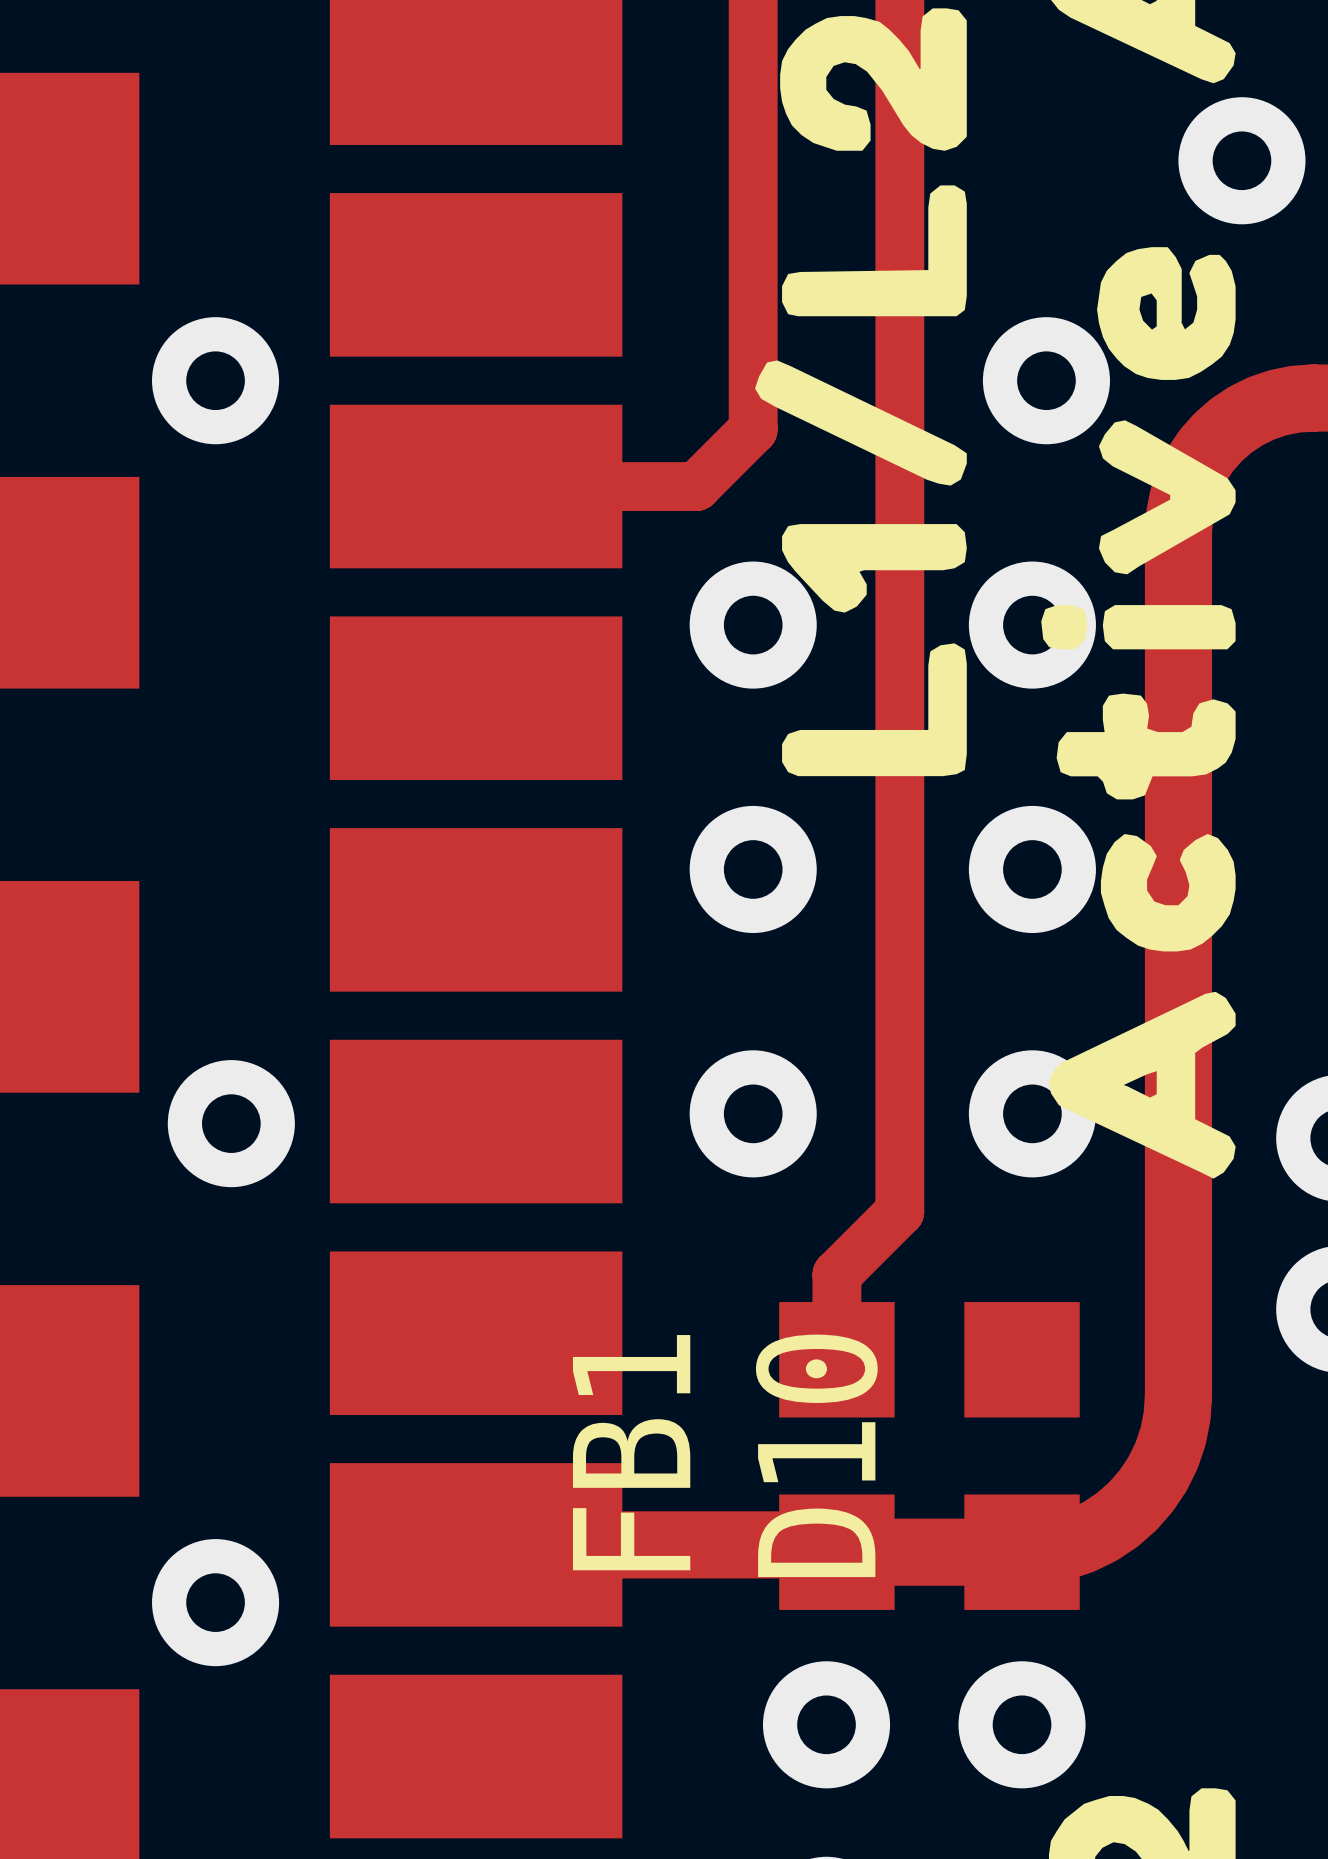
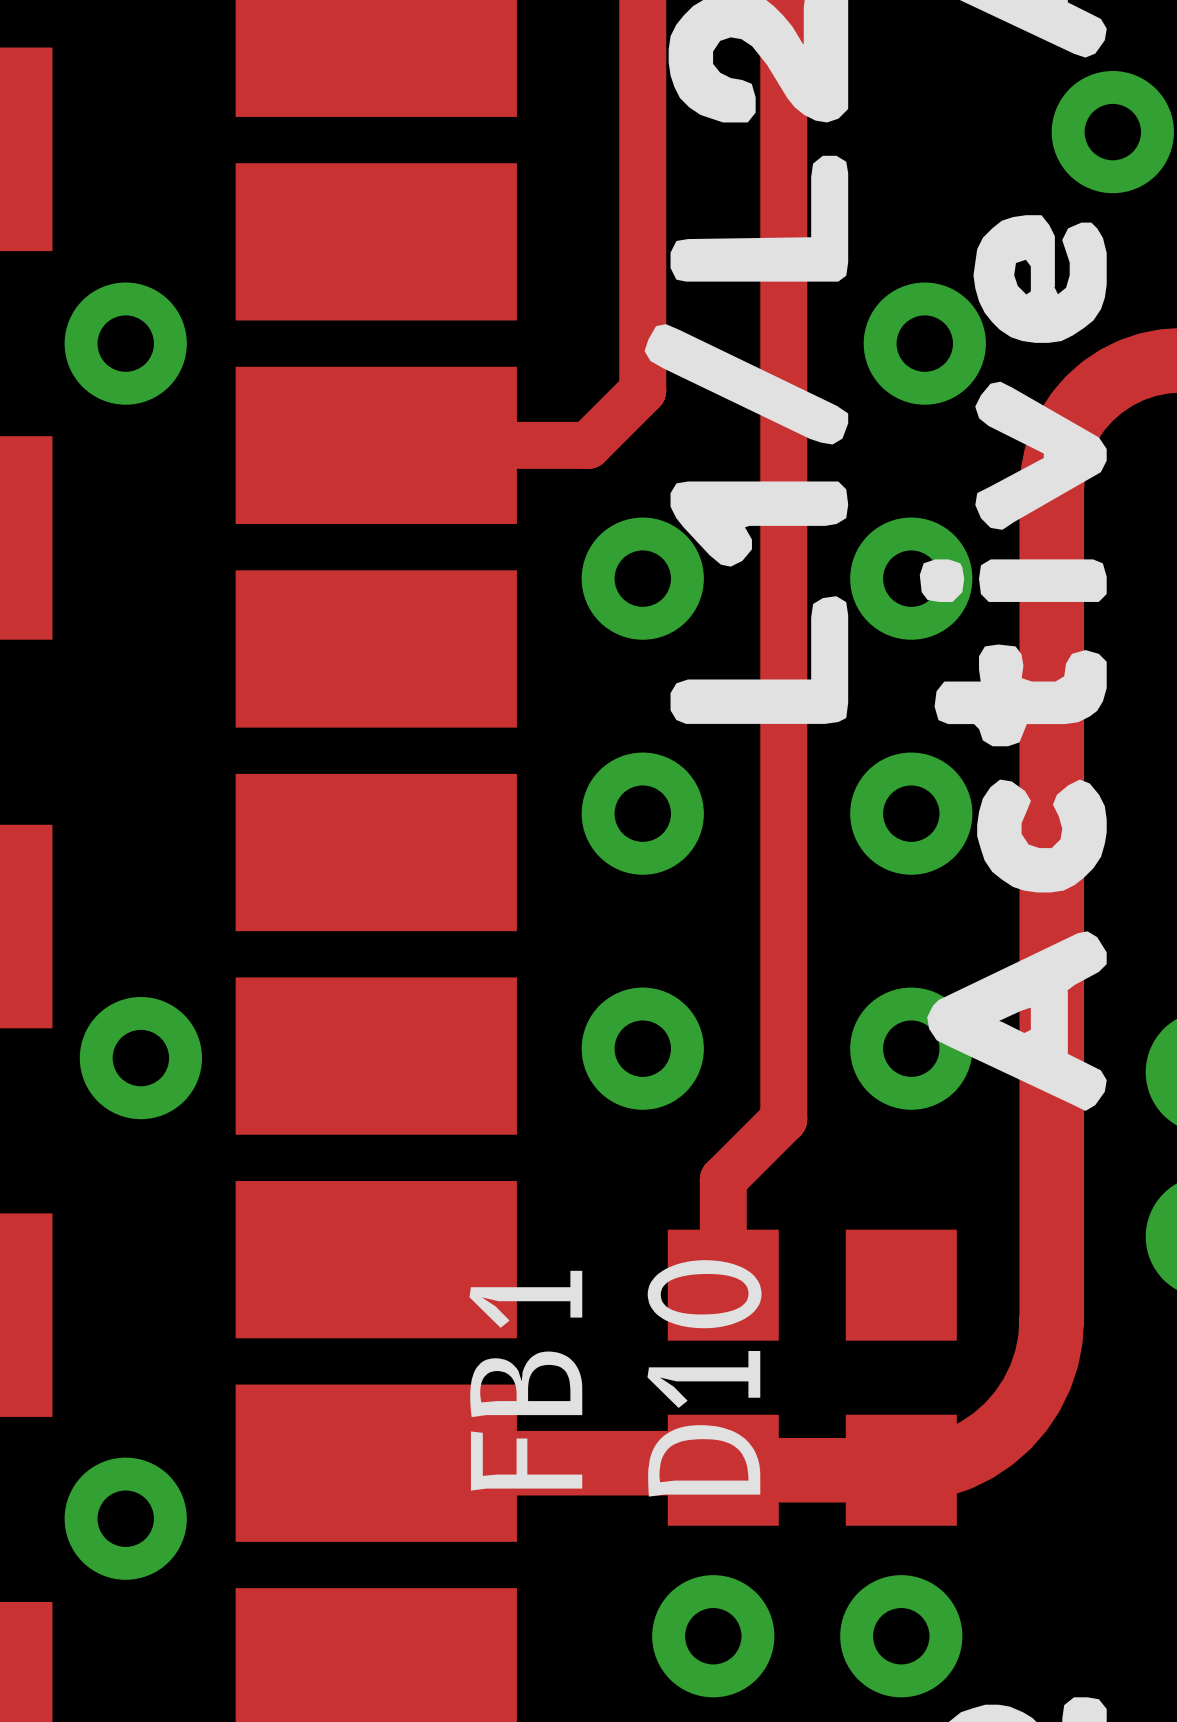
track: (899, 1187) (899, 1211) (836, 1274) -> (783, 1119) (723, 1179) (723, 1203)

